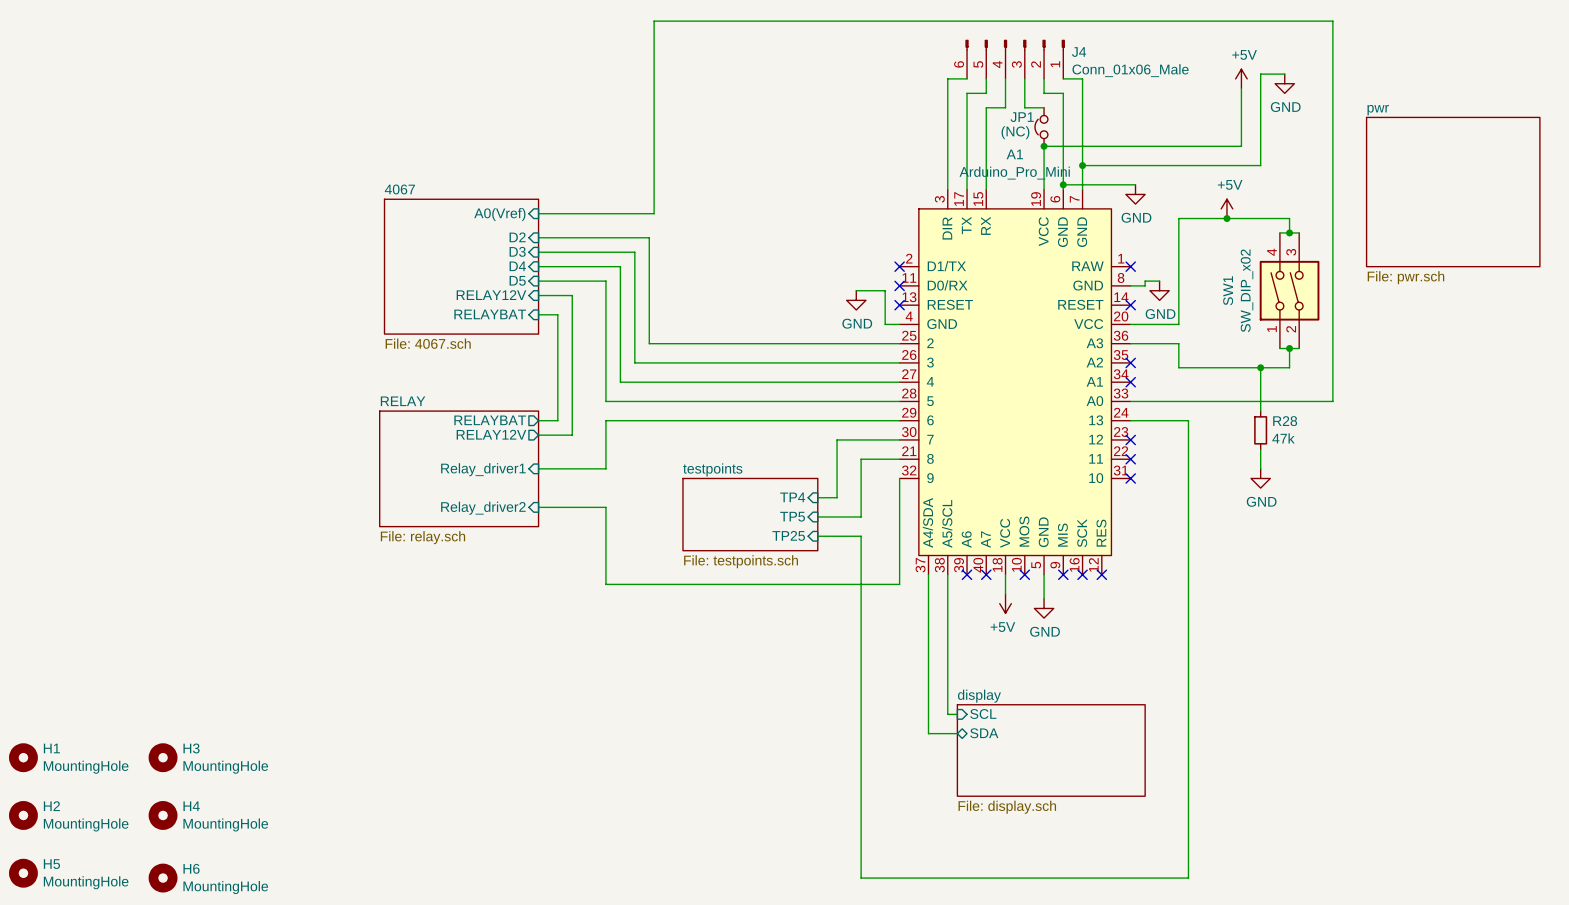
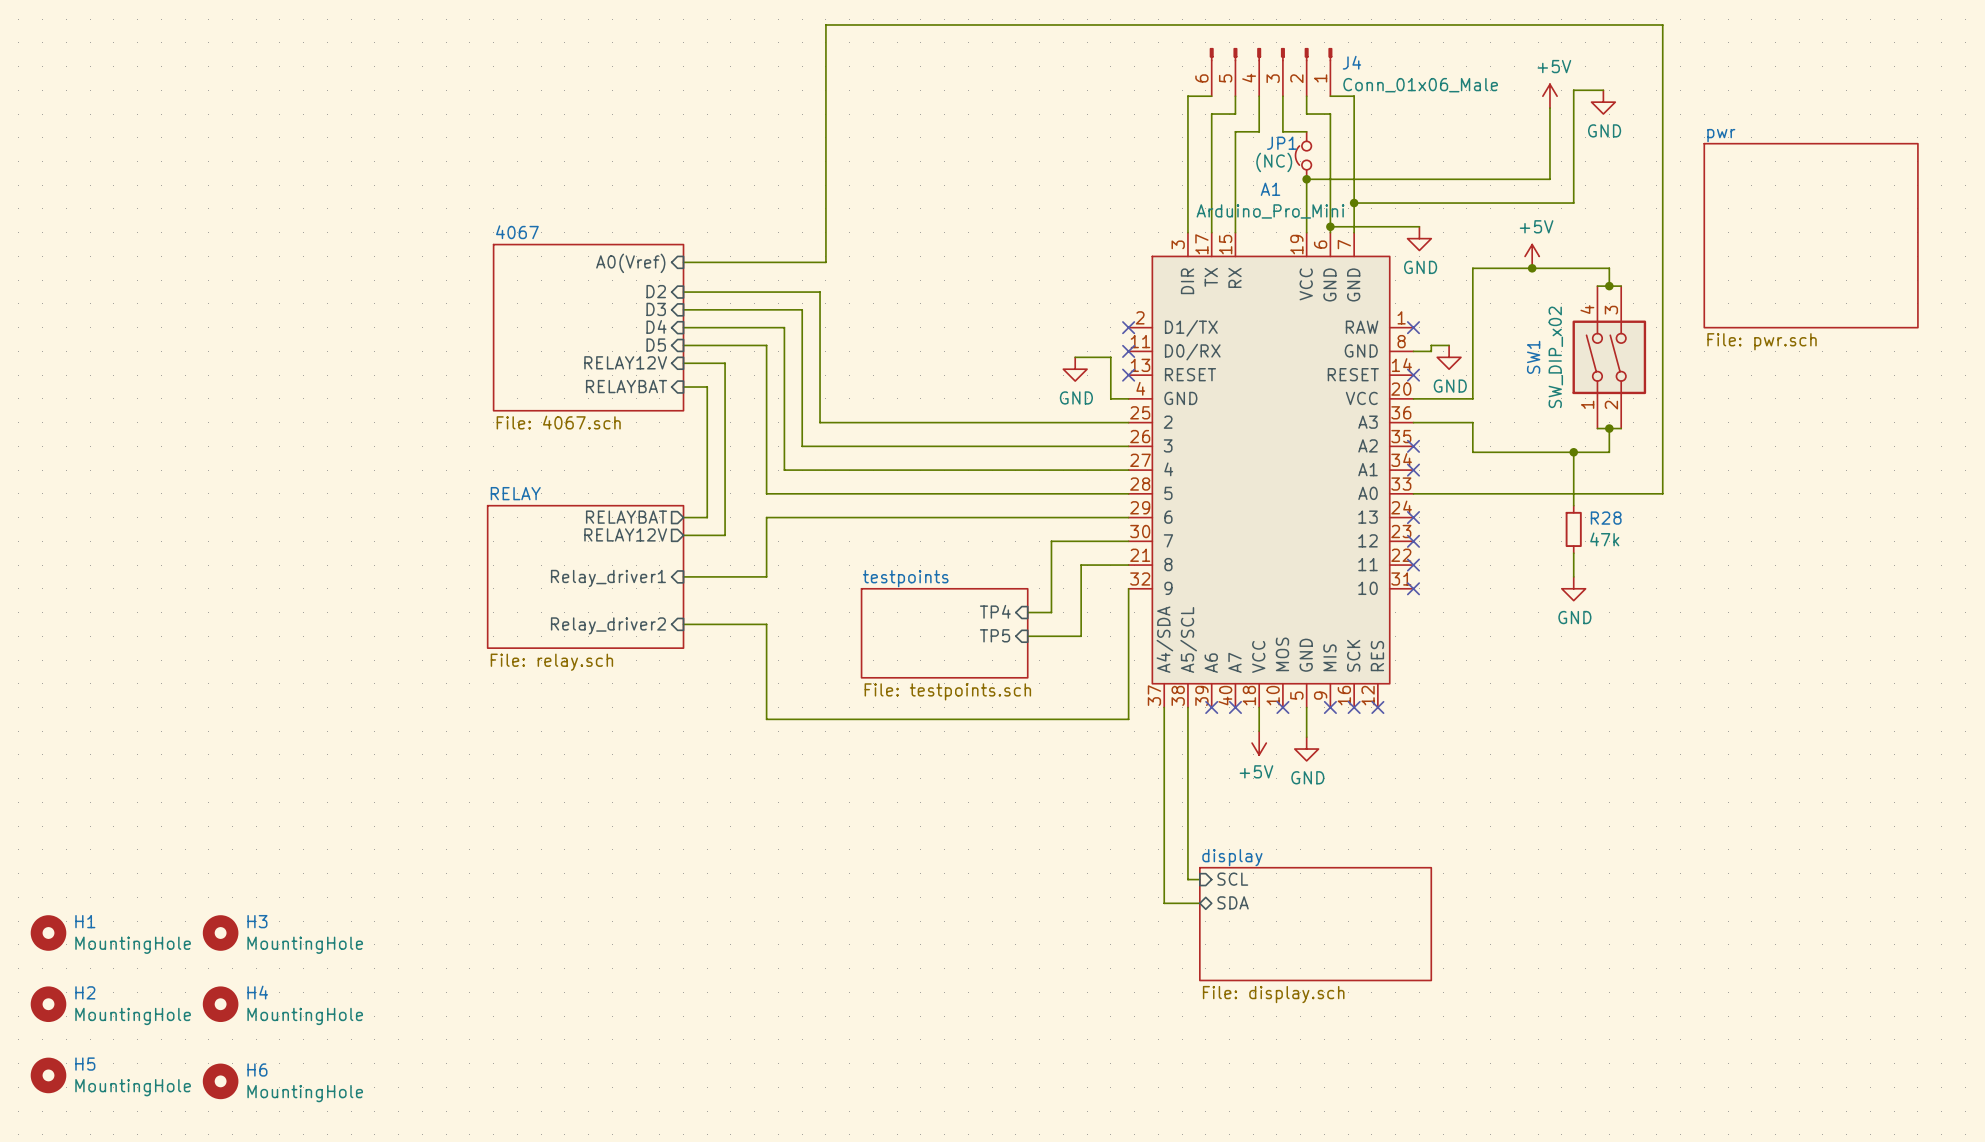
wire: (1130, 420) (1188, 420) (1188, 878) (861, 878) (861, 536) (817, 536) -> none
no-connect mark: none -> (1413, 517)
sheet pin: TP25 (788, 535) -> none

